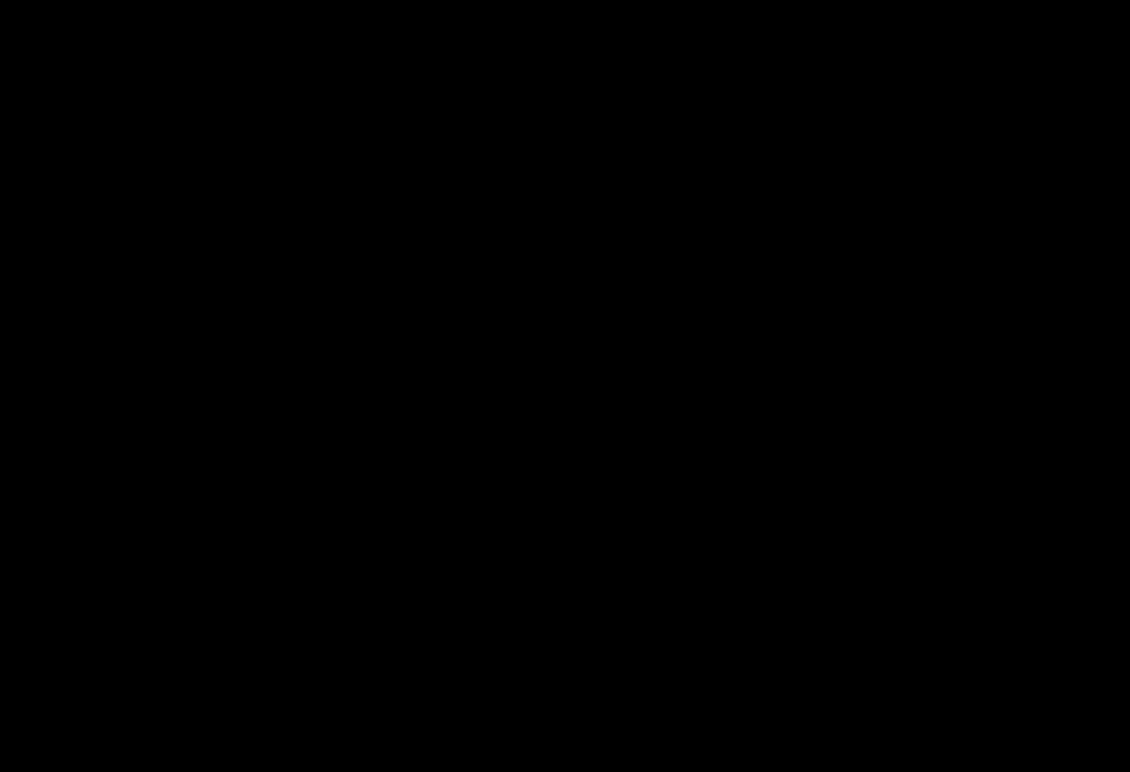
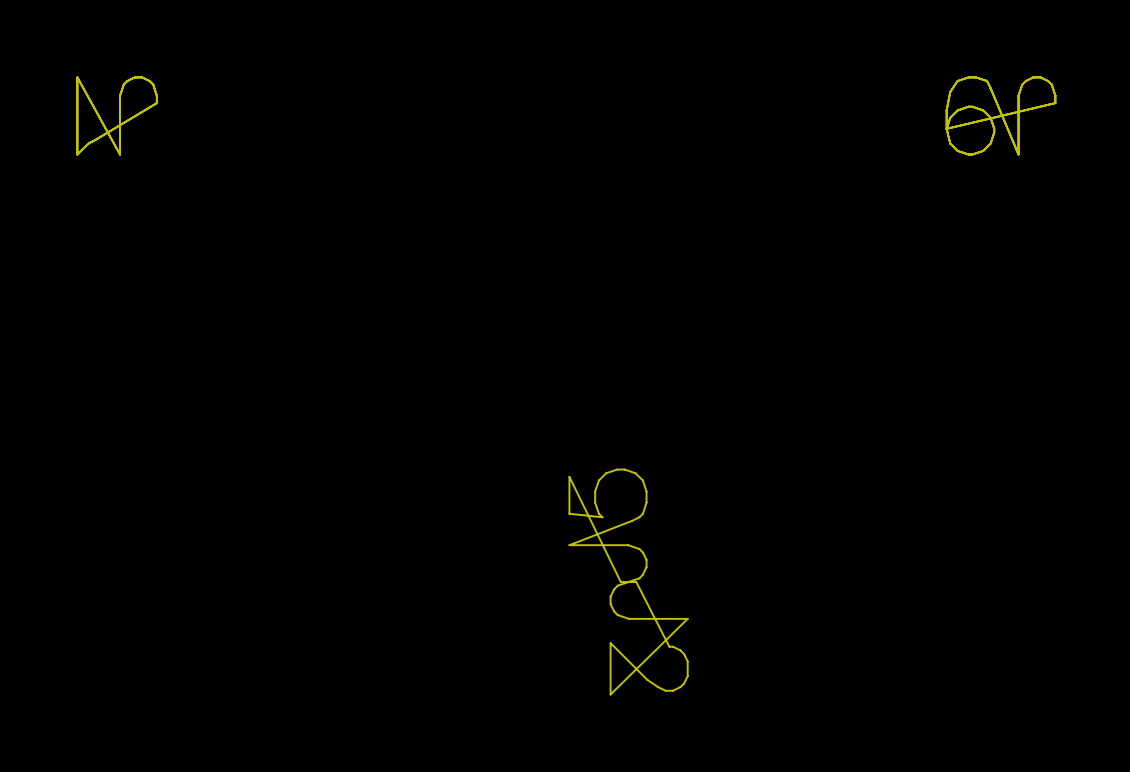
board edge: none -> (77, 77) (77, 154) (88, 143) (95, 139) (156, 103) (153, 84) (142, 77) (134, 77) (123, 84) (120, 95) (120, 154) (77, 77)
board edge: none -> (946, 128) (1055, 103) (1051, 84) (1040, 77) (1033, 77) (1022, 84) (1018, 95) (1018, 154) (990, 88) (987, 81) (975, 77) (957, 81) (950, 91) (946, 110) (946, 128)
board edge: none -> (946, 128) (950, 117) (957, 110) (972, 106) (983, 110) (990, 117) (994, 132) (990, 143) (983, 150) (968, 154) (957, 150) (950, 143) (946, 128)
board edge: none -> (617, 469) (606, 473) (598, 480) (595, 491) (595, 502) (598, 513) (602, 517) (569, 513) (569, 476) (620, 582) (628, 582) (639, 578) (646, 567) (646, 559) (639, 548) (628, 545) (569, 545) (631, 520) (642, 513) (646, 502) (646, 491) (642, 480) (635, 473) (617, 469)
board edge: none -> (628, 582) (617, 585) (610, 596) (610, 604) (617, 615) (628, 618) (687, 618) (610, 694) (610, 643) (647, 679) (665, 690) (672, 690) (684, 683) (687, 676) (687, 661) (680, 650) (669, 646) (636, 582) (628, 582)

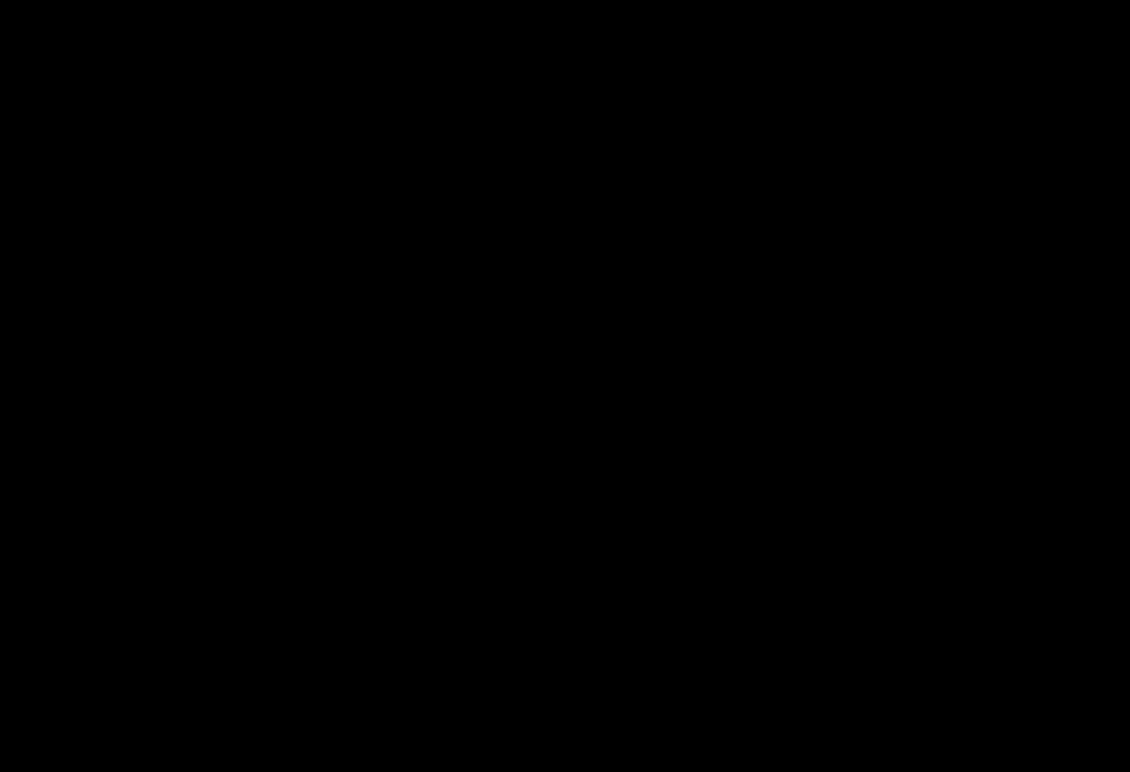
board edge: (77, 77) (77, 154) (88, 143) (95, 139) (156, 103) (153, 84) (142, 77) (134, 77) (123, 84) (120, 95) (120, 154) (77, 77) -> none
board edge: (946, 128) (1055, 103) (1051, 84) (1040, 77) (1033, 77) (1022, 84) (1018, 95) (1018, 154) (990, 88) (987, 81) (975, 77) (957, 81) (950, 91) (946, 110) (946, 128) -> none
board edge: (946, 128) (950, 117) (957, 110) (972, 106) (983, 110) (990, 117) (994, 132) (990, 143) (983, 150) (968, 154) (957, 150) (950, 143) (946, 128) -> none
board edge: (617, 469) (606, 473) (598, 480) (595, 491) (595, 502) (598, 513) (602, 517) (569, 513) (569, 476) (620, 582) (628, 582) (639, 578) (646, 567) (646, 559) (639, 548) (628, 545) (569, 545) (631, 520) (642, 513) (646, 502) (646, 491) (642, 480) (635, 473) (617, 469) -> none
board edge: (628, 582) (617, 585) (610, 596) (610, 604) (617, 615) (628, 618) (687, 618) (610, 694) (610, 643) (647, 679) (665, 690) (672, 690) (684, 683) (687, 676) (687, 661) (680, 650) (669, 646) (636, 582) (628, 582) -> none

